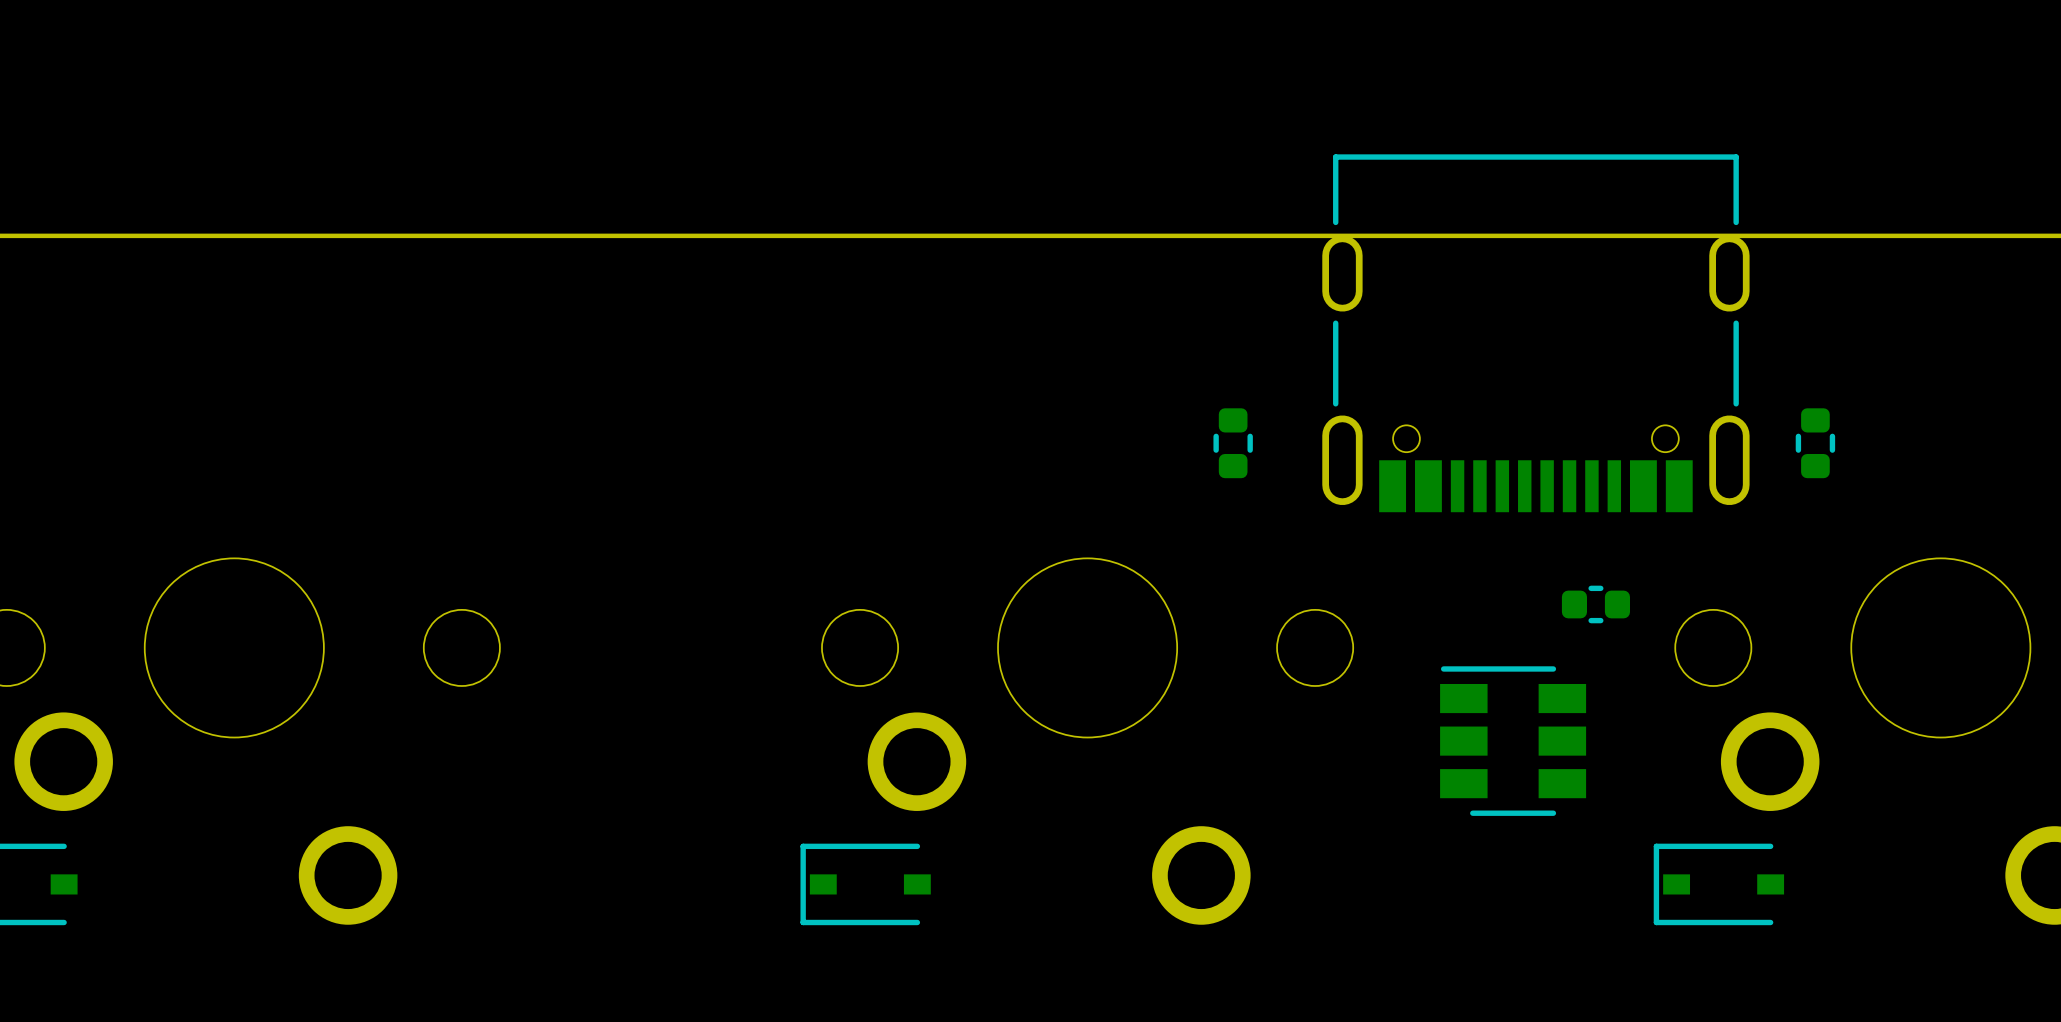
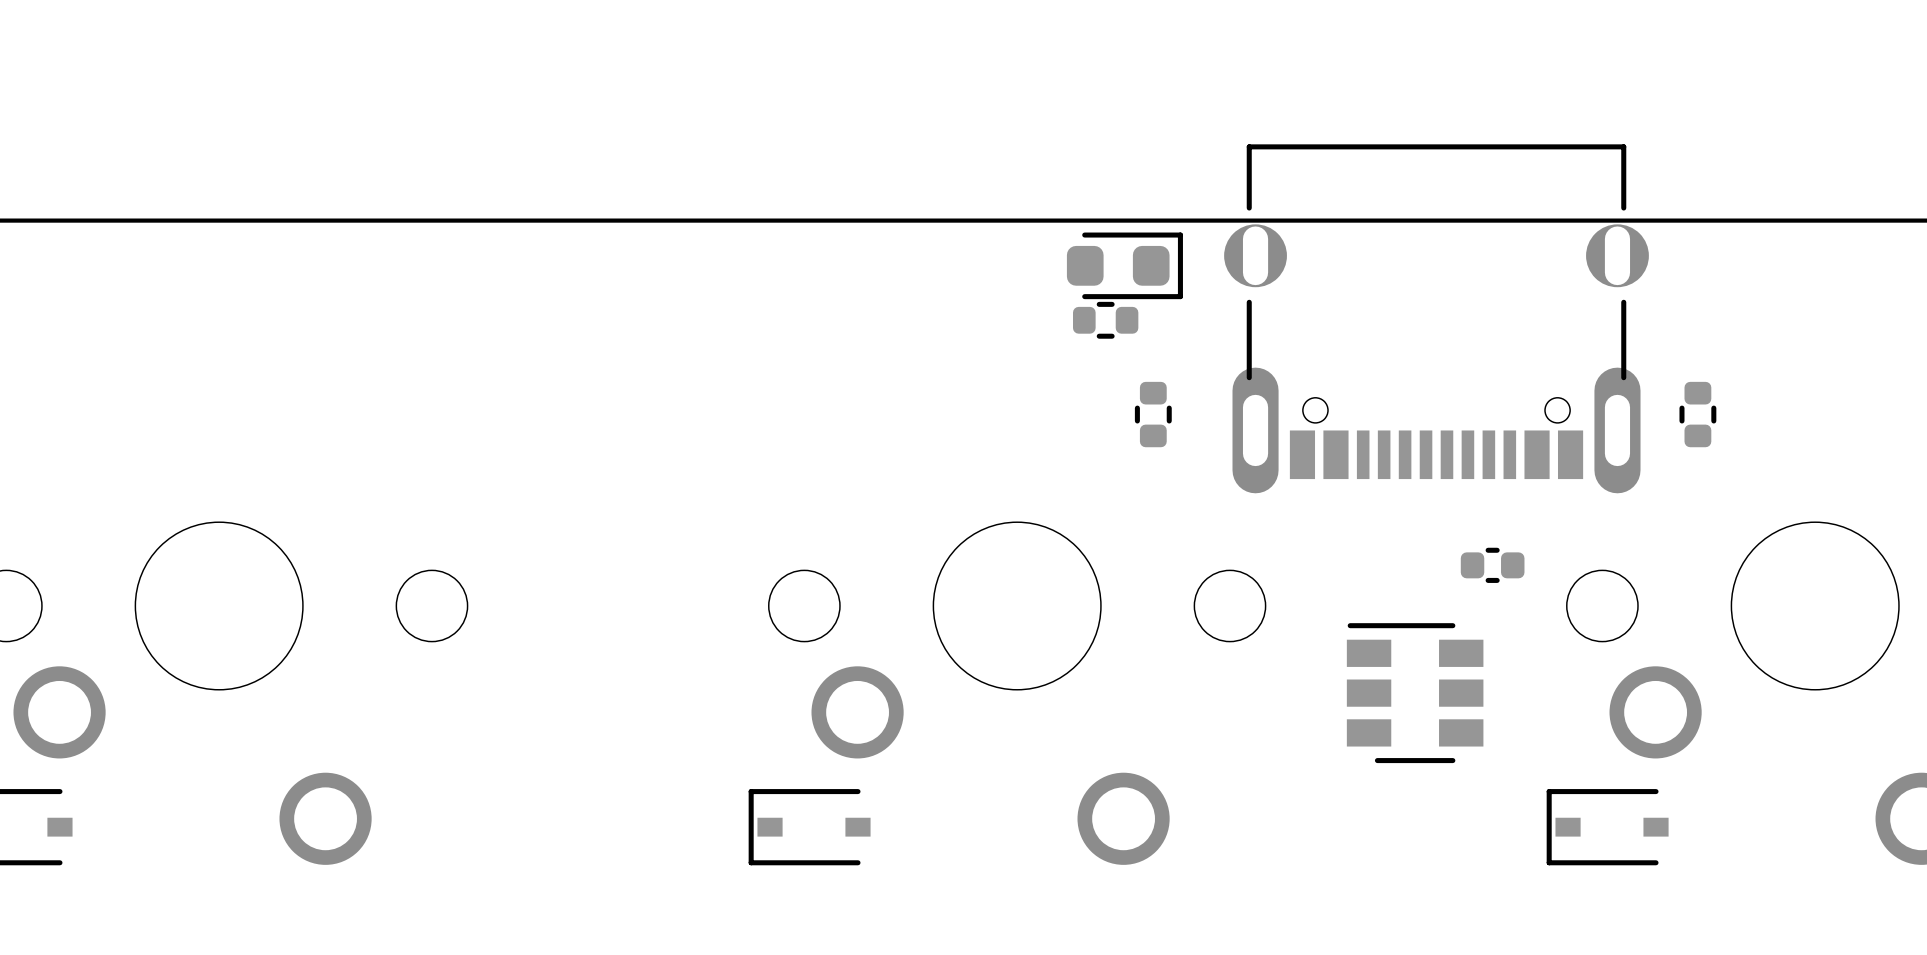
part footprint: [1322, 154, 1750, 513] -> [1224, 144, 1649, 494]
part: none -> (1124, 265)
part: none -> (1105, 320)

